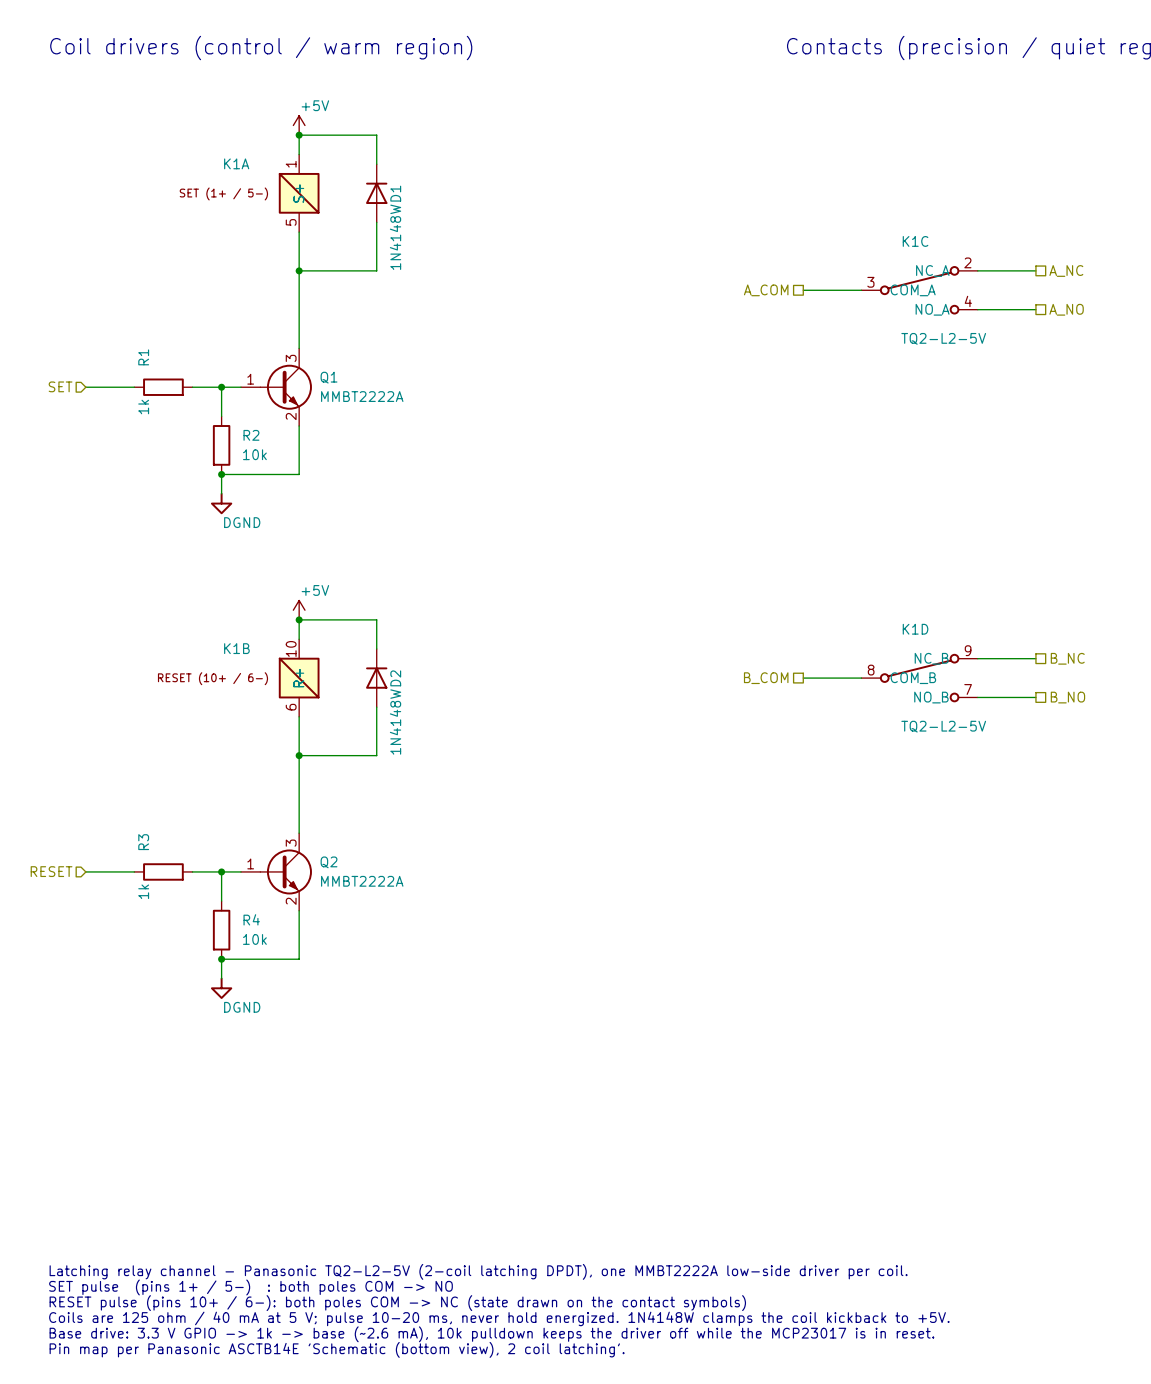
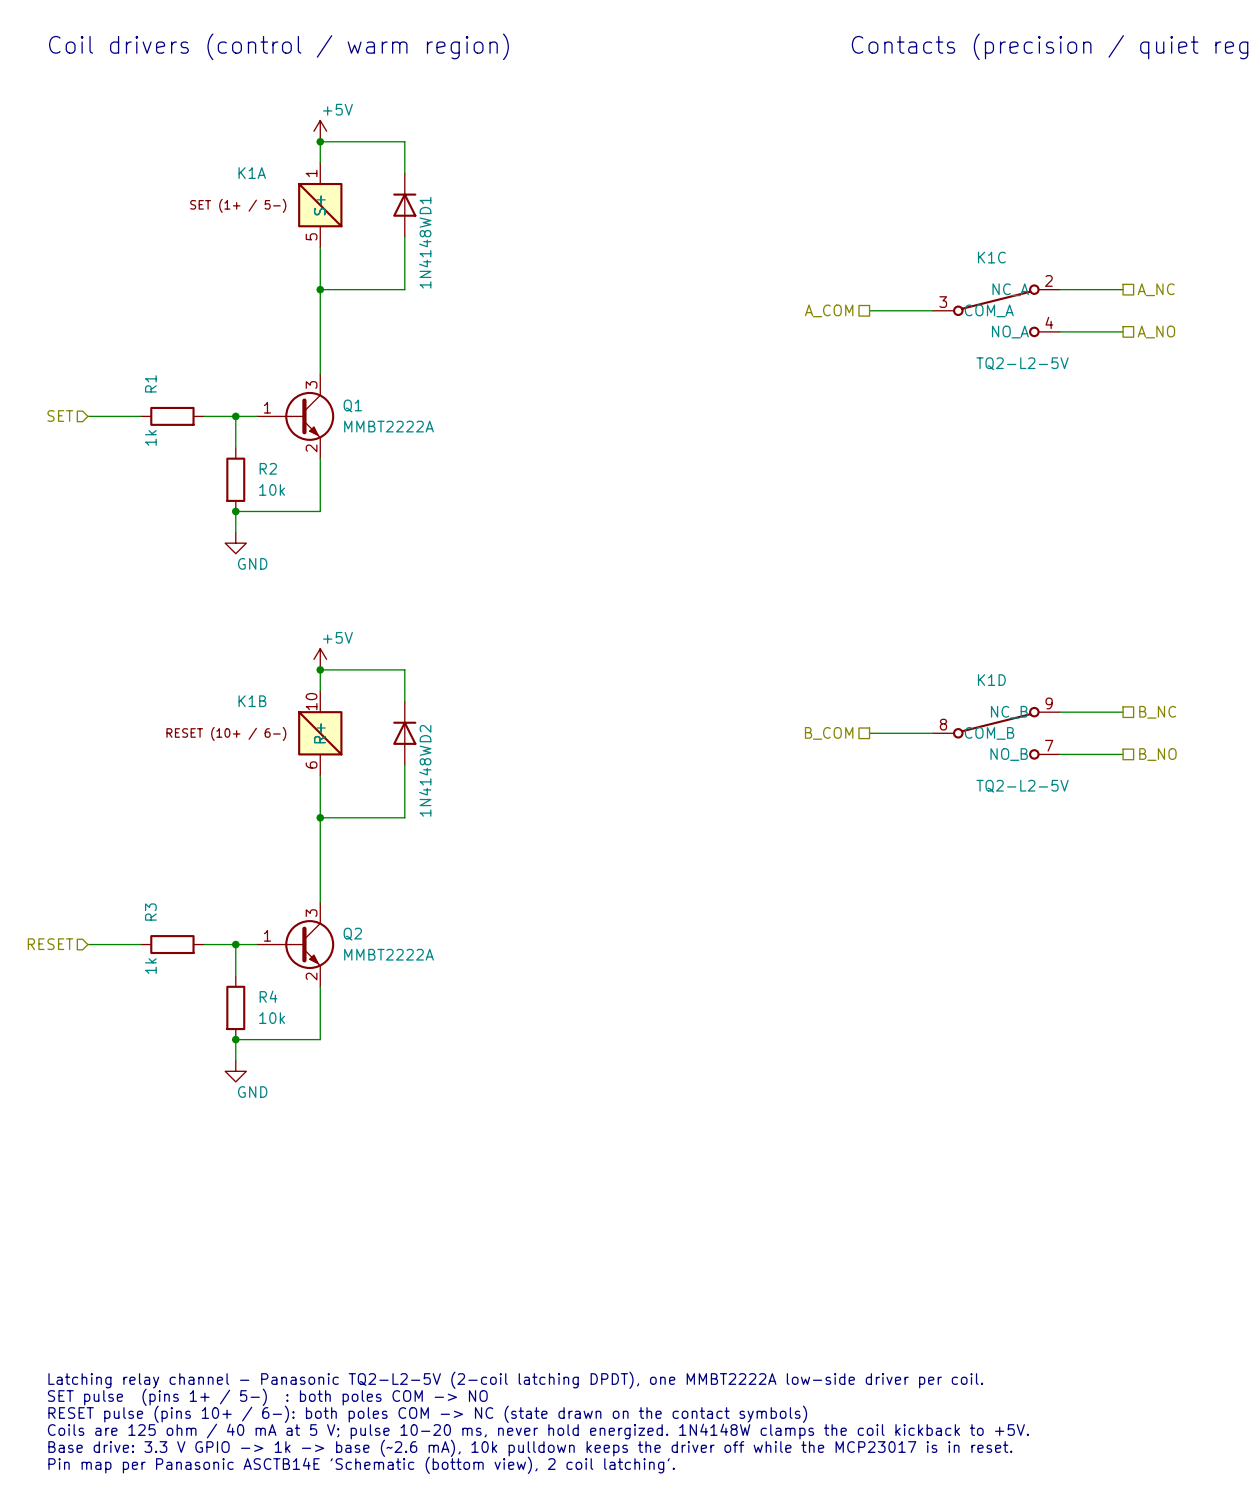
power symbol: DGND (221, 503) -> GND (235, 543)
power symbol: DGND (221, 988) -> GND (235, 1071)

